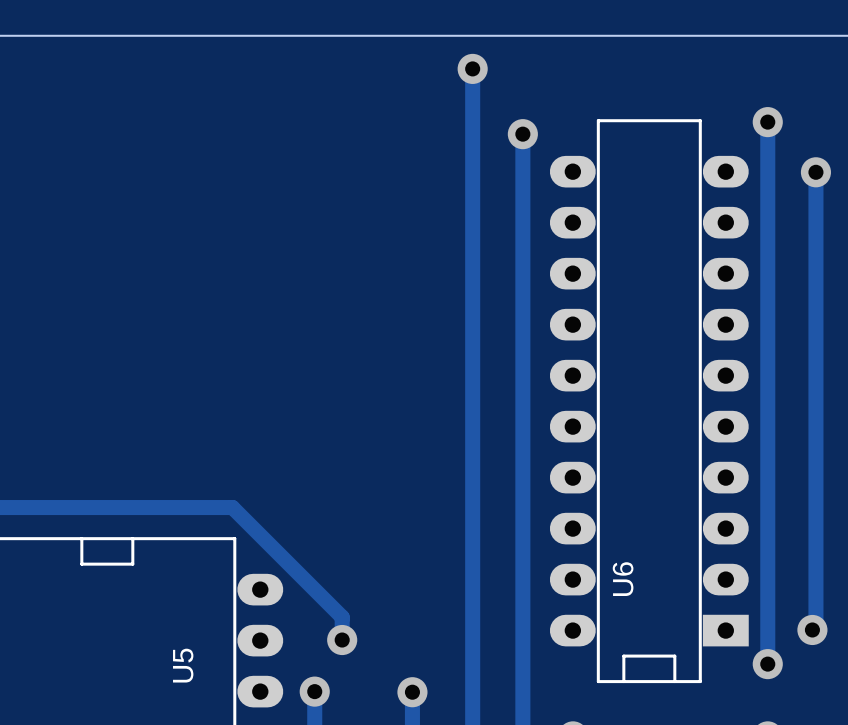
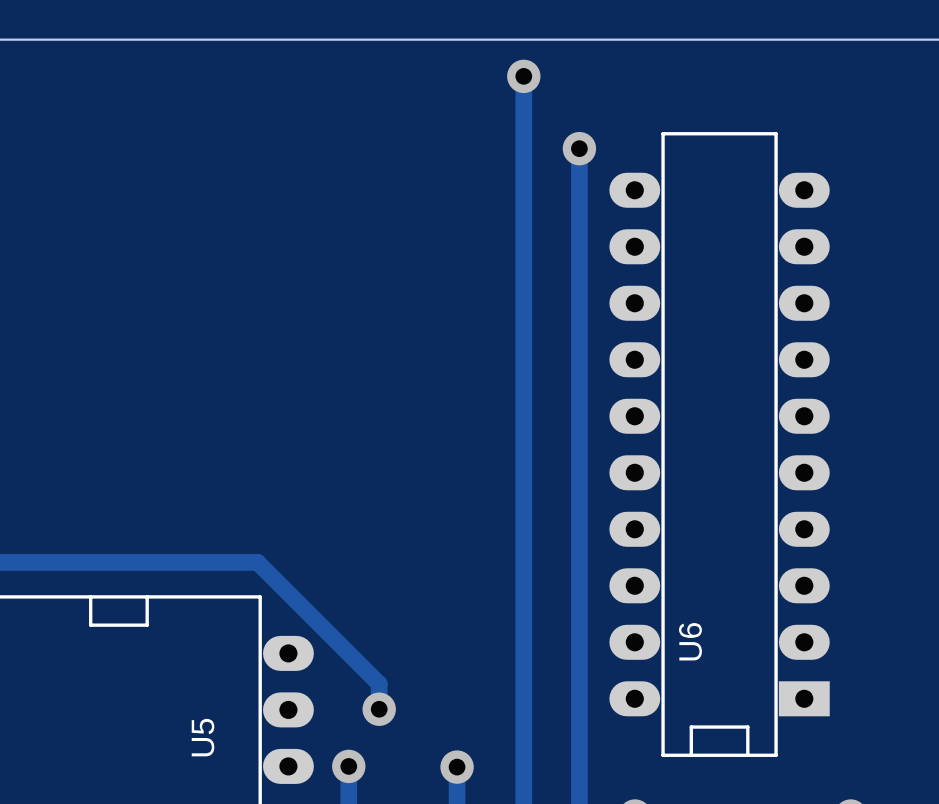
track: (767, 122) (767, 664) -> none
via: (767, 122) -> none
track: (815, 172) (815, 626) (812, 629) -> none
via: (815, 172) -> none
via: (812, 629) -> none
via: (767, 664) -> none

